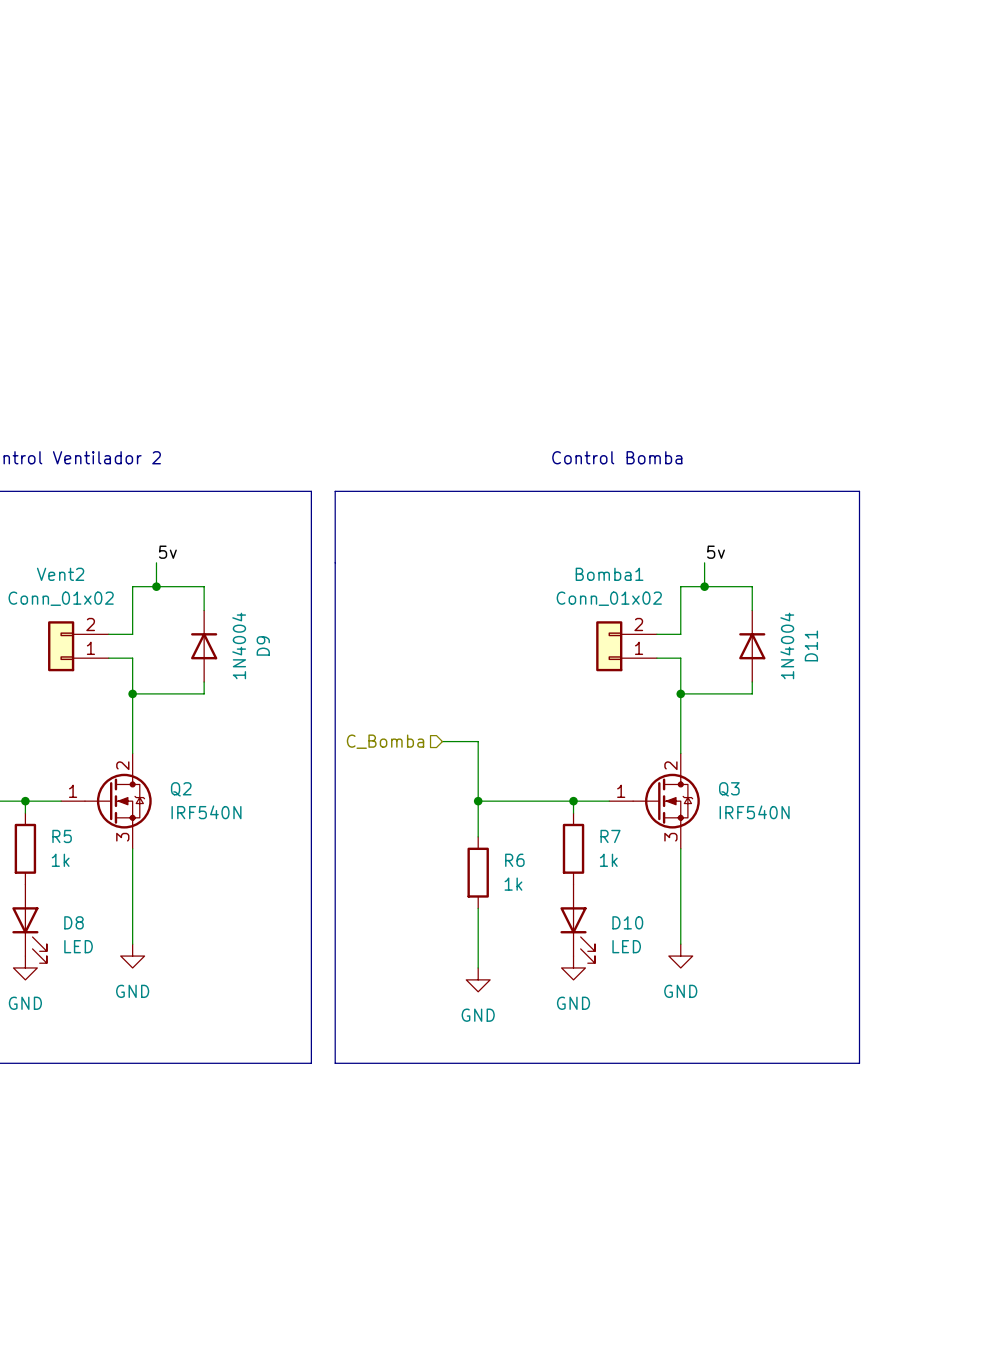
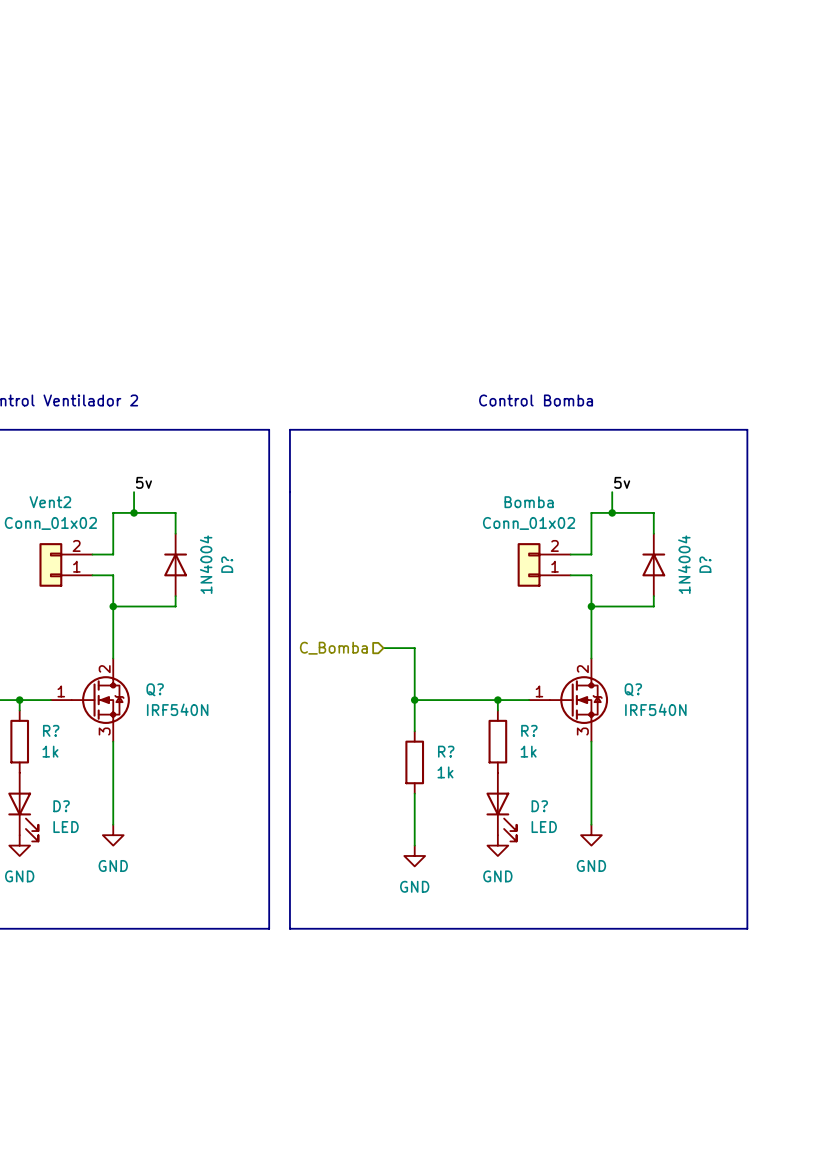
Bomba1 name: Bomba1 (609, 574) -> Bomba (529, 502)
D9 name: D9 (263, 645) -> D? (227, 564)
D11 name: D11 (811, 645) -> D? (705, 564)
Q2 name: Q2 (181, 789) -> Q? (155, 689)
Q3 name: Q3 (729, 789) -> Q? (633, 689)
R5 name: R5 (62, 836) -> R? (51, 730)
R7 name: R7 (610, 836) -> R? (529, 730)
R6 name: R6 (514, 860) -> R? (446, 751)
D8 name: D8 (74, 922) -> D? (61, 806)
D10 name: D10 (627, 922) -> D? (539, 806)

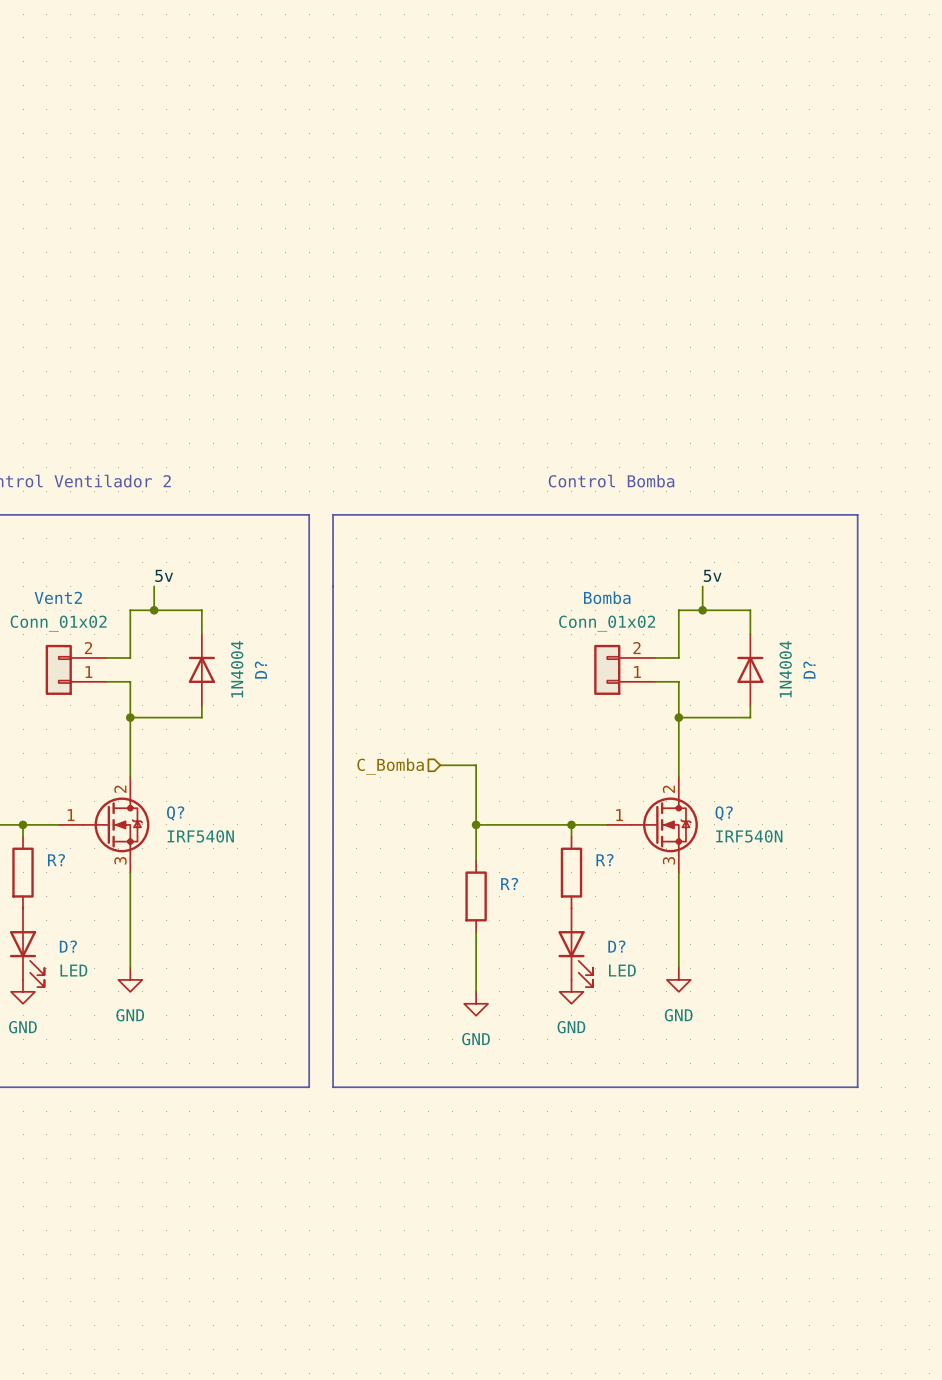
R? value: 1k (50, 751) -> none
R? value: 1k (528, 751) -> none
R? value: 1k (445, 772) -> none

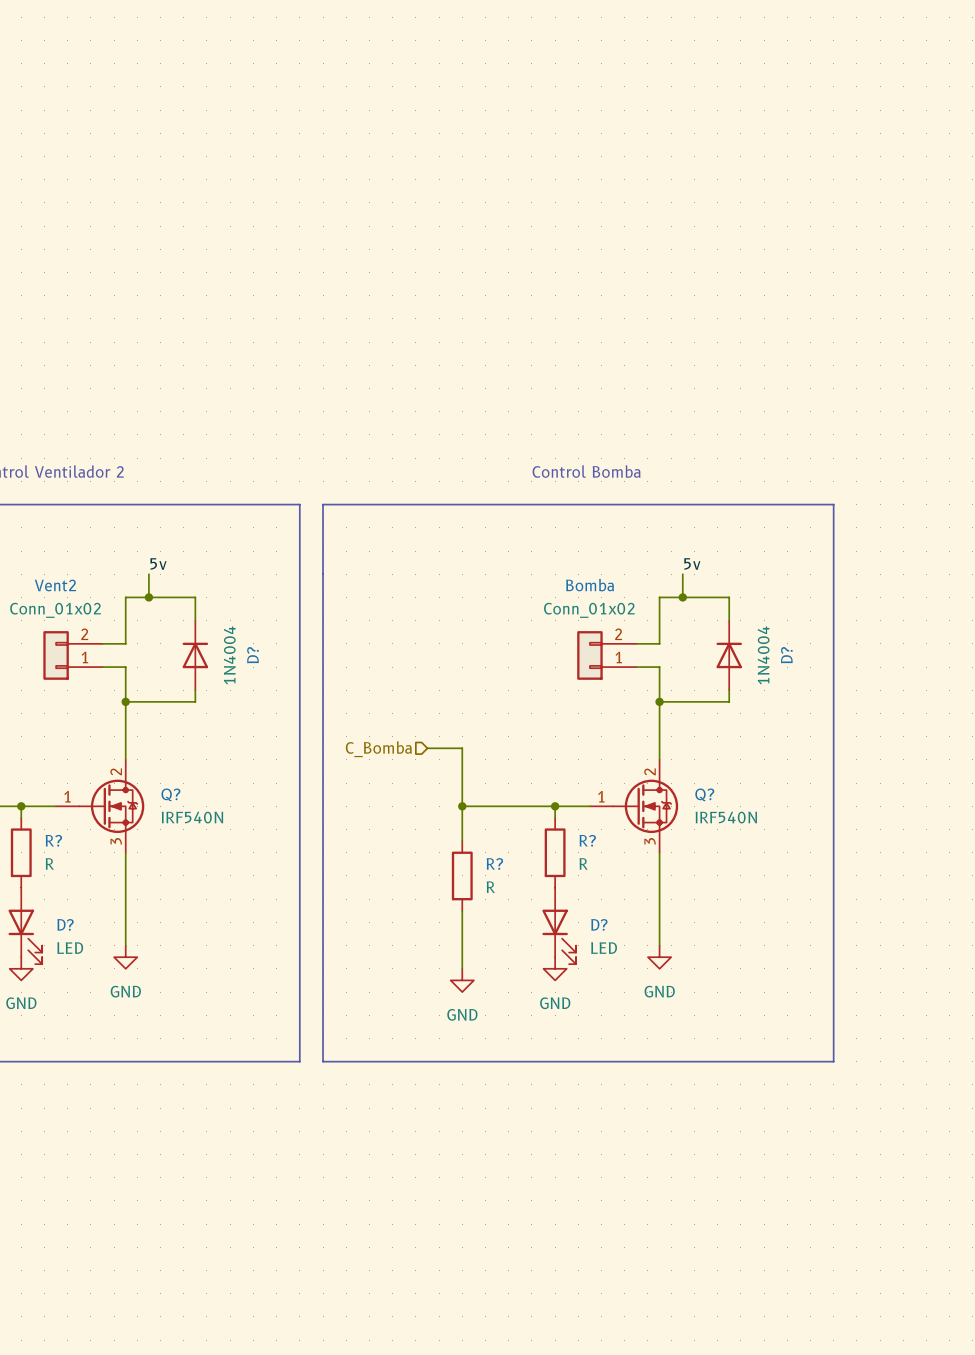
R? value: none -> R (49, 863)
R? value: none -> R (583, 863)
R? value: none -> R (490, 887)

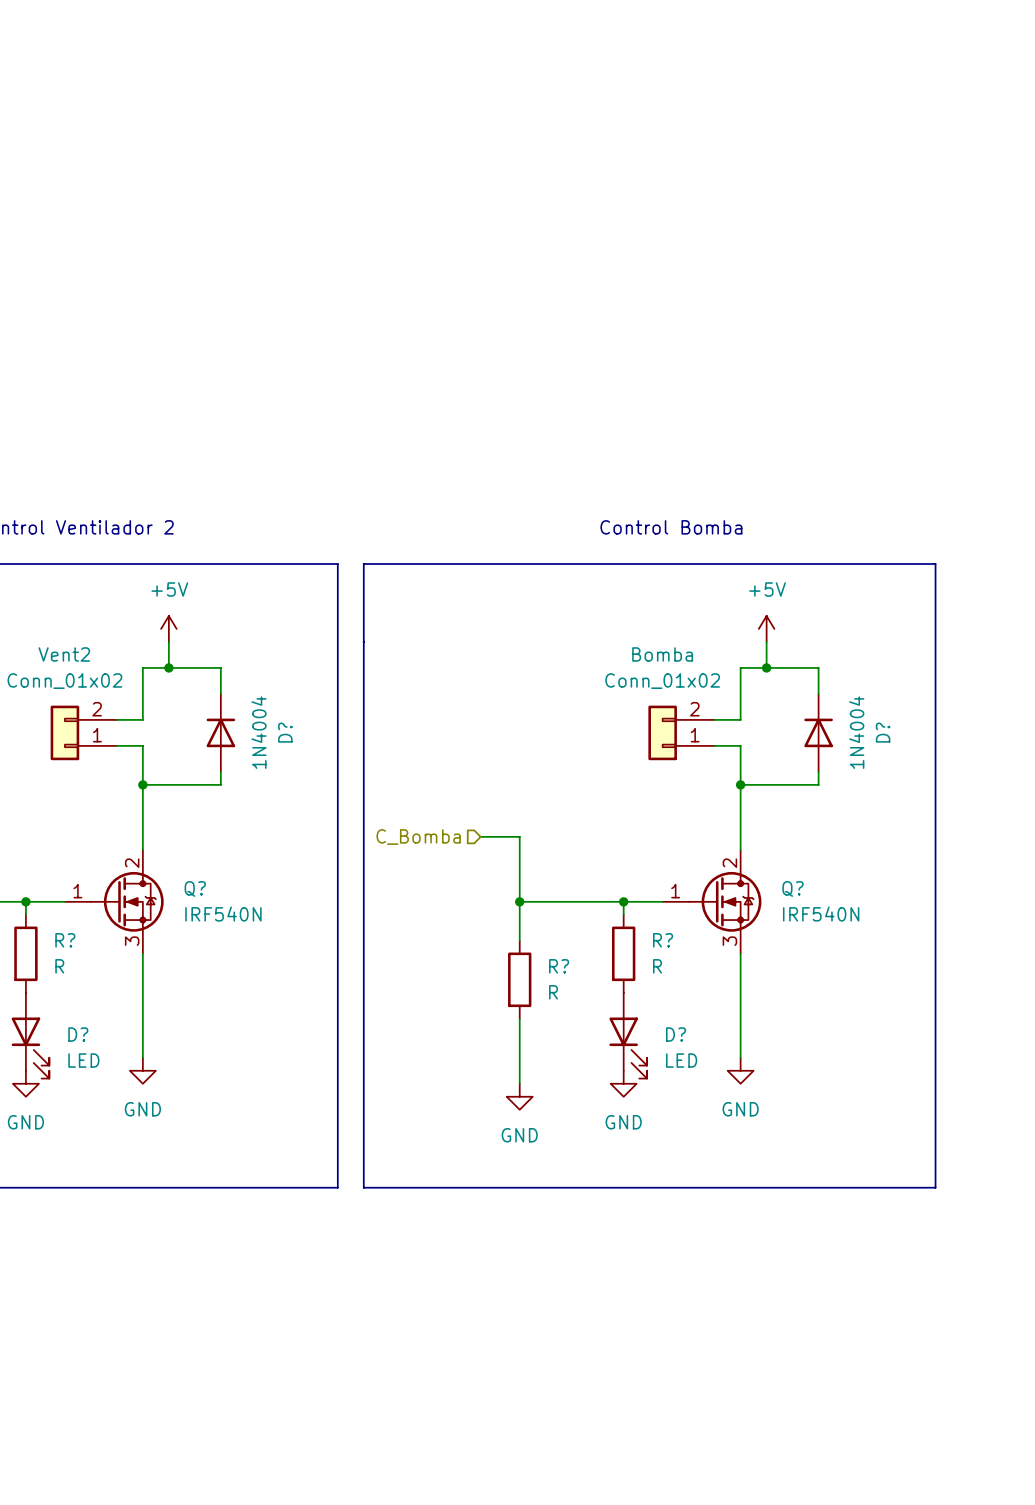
power symbol: none -> +5V (168, 628)
power symbol: none -> +5V (766, 628)
label: 5v (158, 564) -> none
label: 5v (692, 564) -> none

